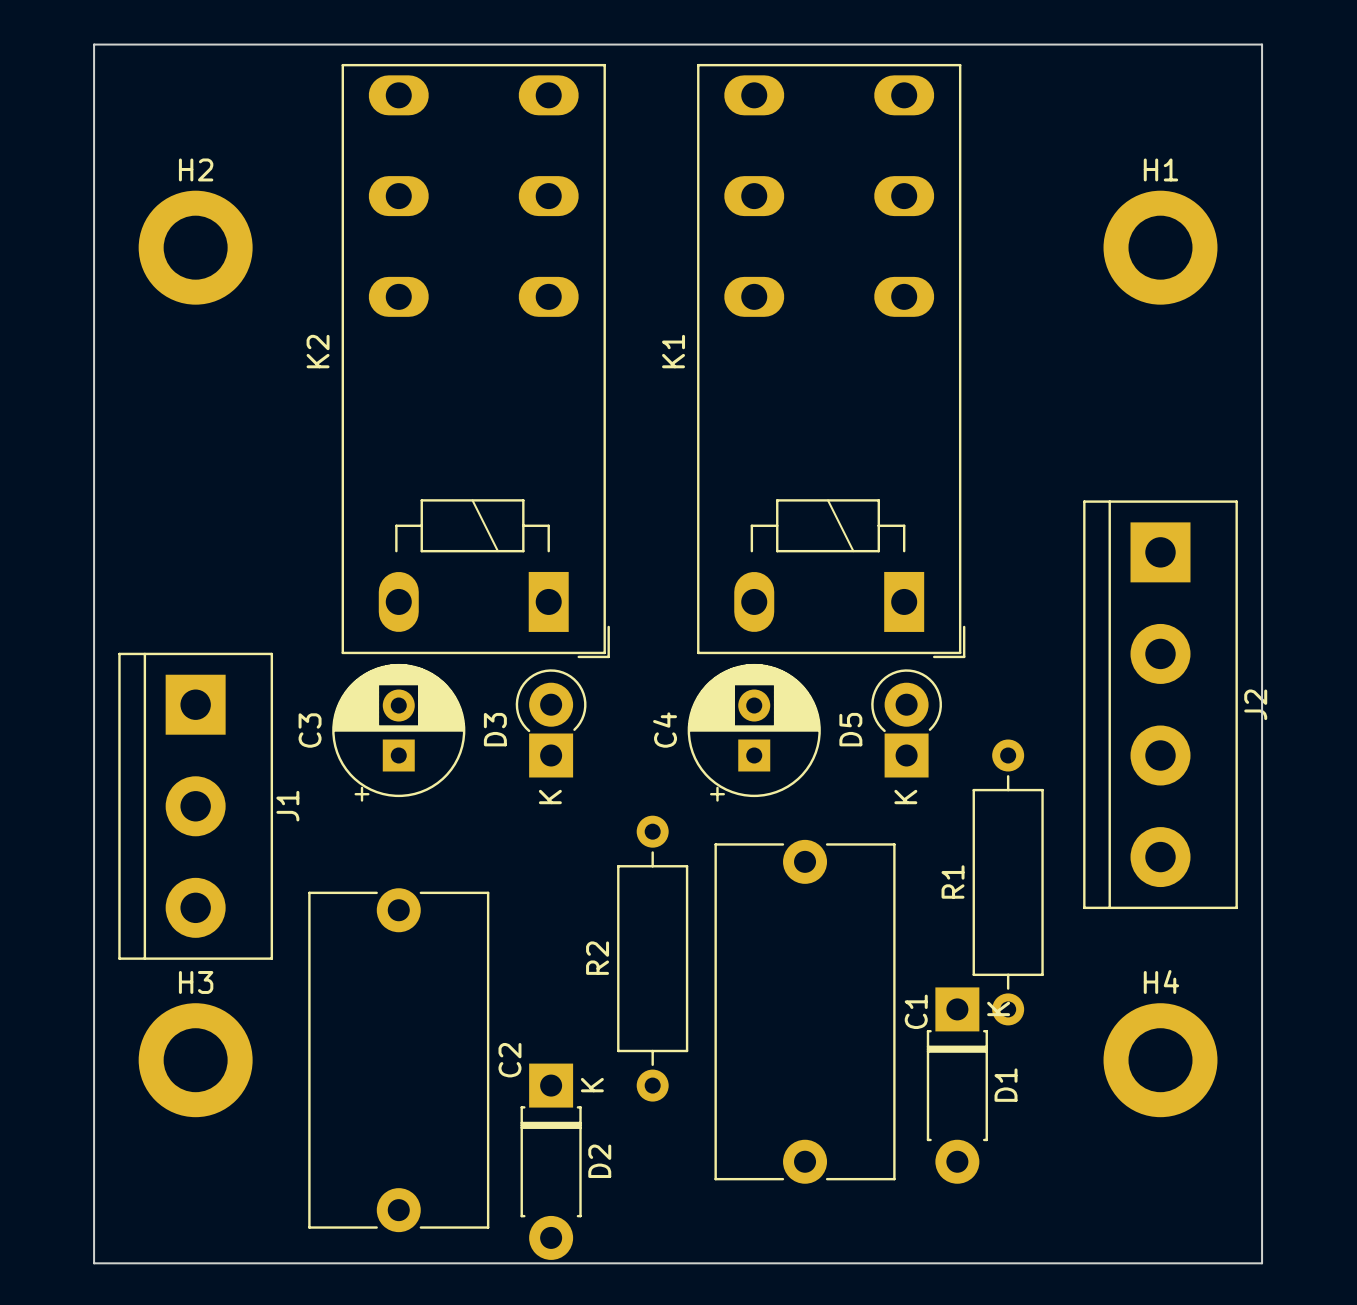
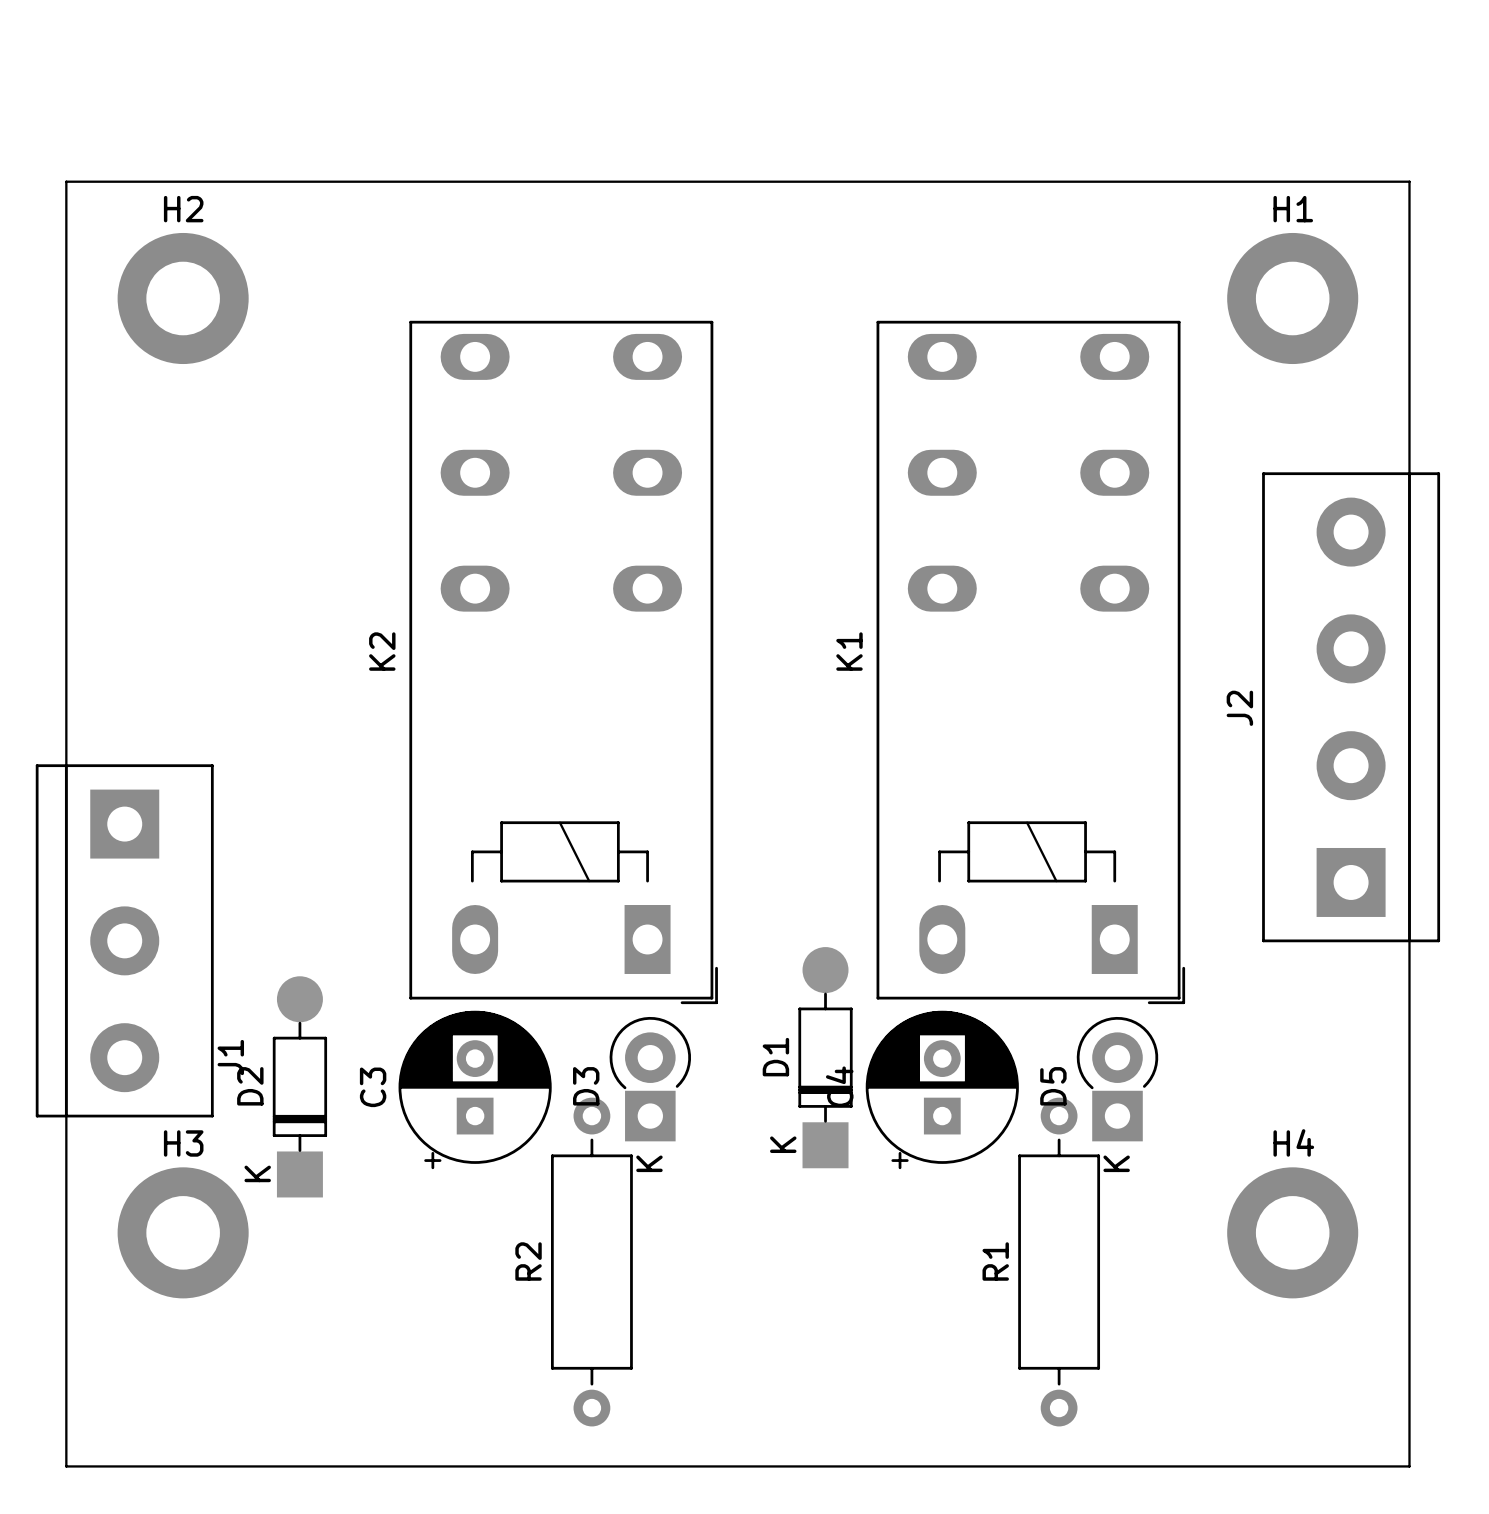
board edge: (94, 146) (94, 44) (1262, 44) (1262, 146) -> (66, 181) (1409, 181)
K2 position: (475, 361) -> (563, 662)
K1 position: (831, 361) -> (1030, 662)
J2 rotation: 0° (1160, 704) -> 180° (1351, 707)
D3 position: (551, 723) -> (650, 1079)
D5 position: (906, 723) -> (1117, 1079)
C3 position: (398, 732) -> (475, 1089)
C4 position: (754, 732) -> (942, 1089)
J1 position: (195, 806) -> (124, 940)
J1 name position: J1 (287, 806) -> J1 (230, 1057)
R1 position: (1008, 882) -> (1059, 1262)
R2 position: (652, 958) -> (591, 1262)
D1 footprint: [926, 987, 988, 1184] -> [798, 947, 853, 1169]
C1: (805, 1011) -> none
C2: (398, 1060) -> none
D2 footprint: [520, 1063, 582, 1260] -> [272, 976, 328, 1198]
D1 name position: D1 (1006, 1085) -> D1 (775, 1057)
D2 name position: D2 (599, 1161) -> D2 (250, 1086)

